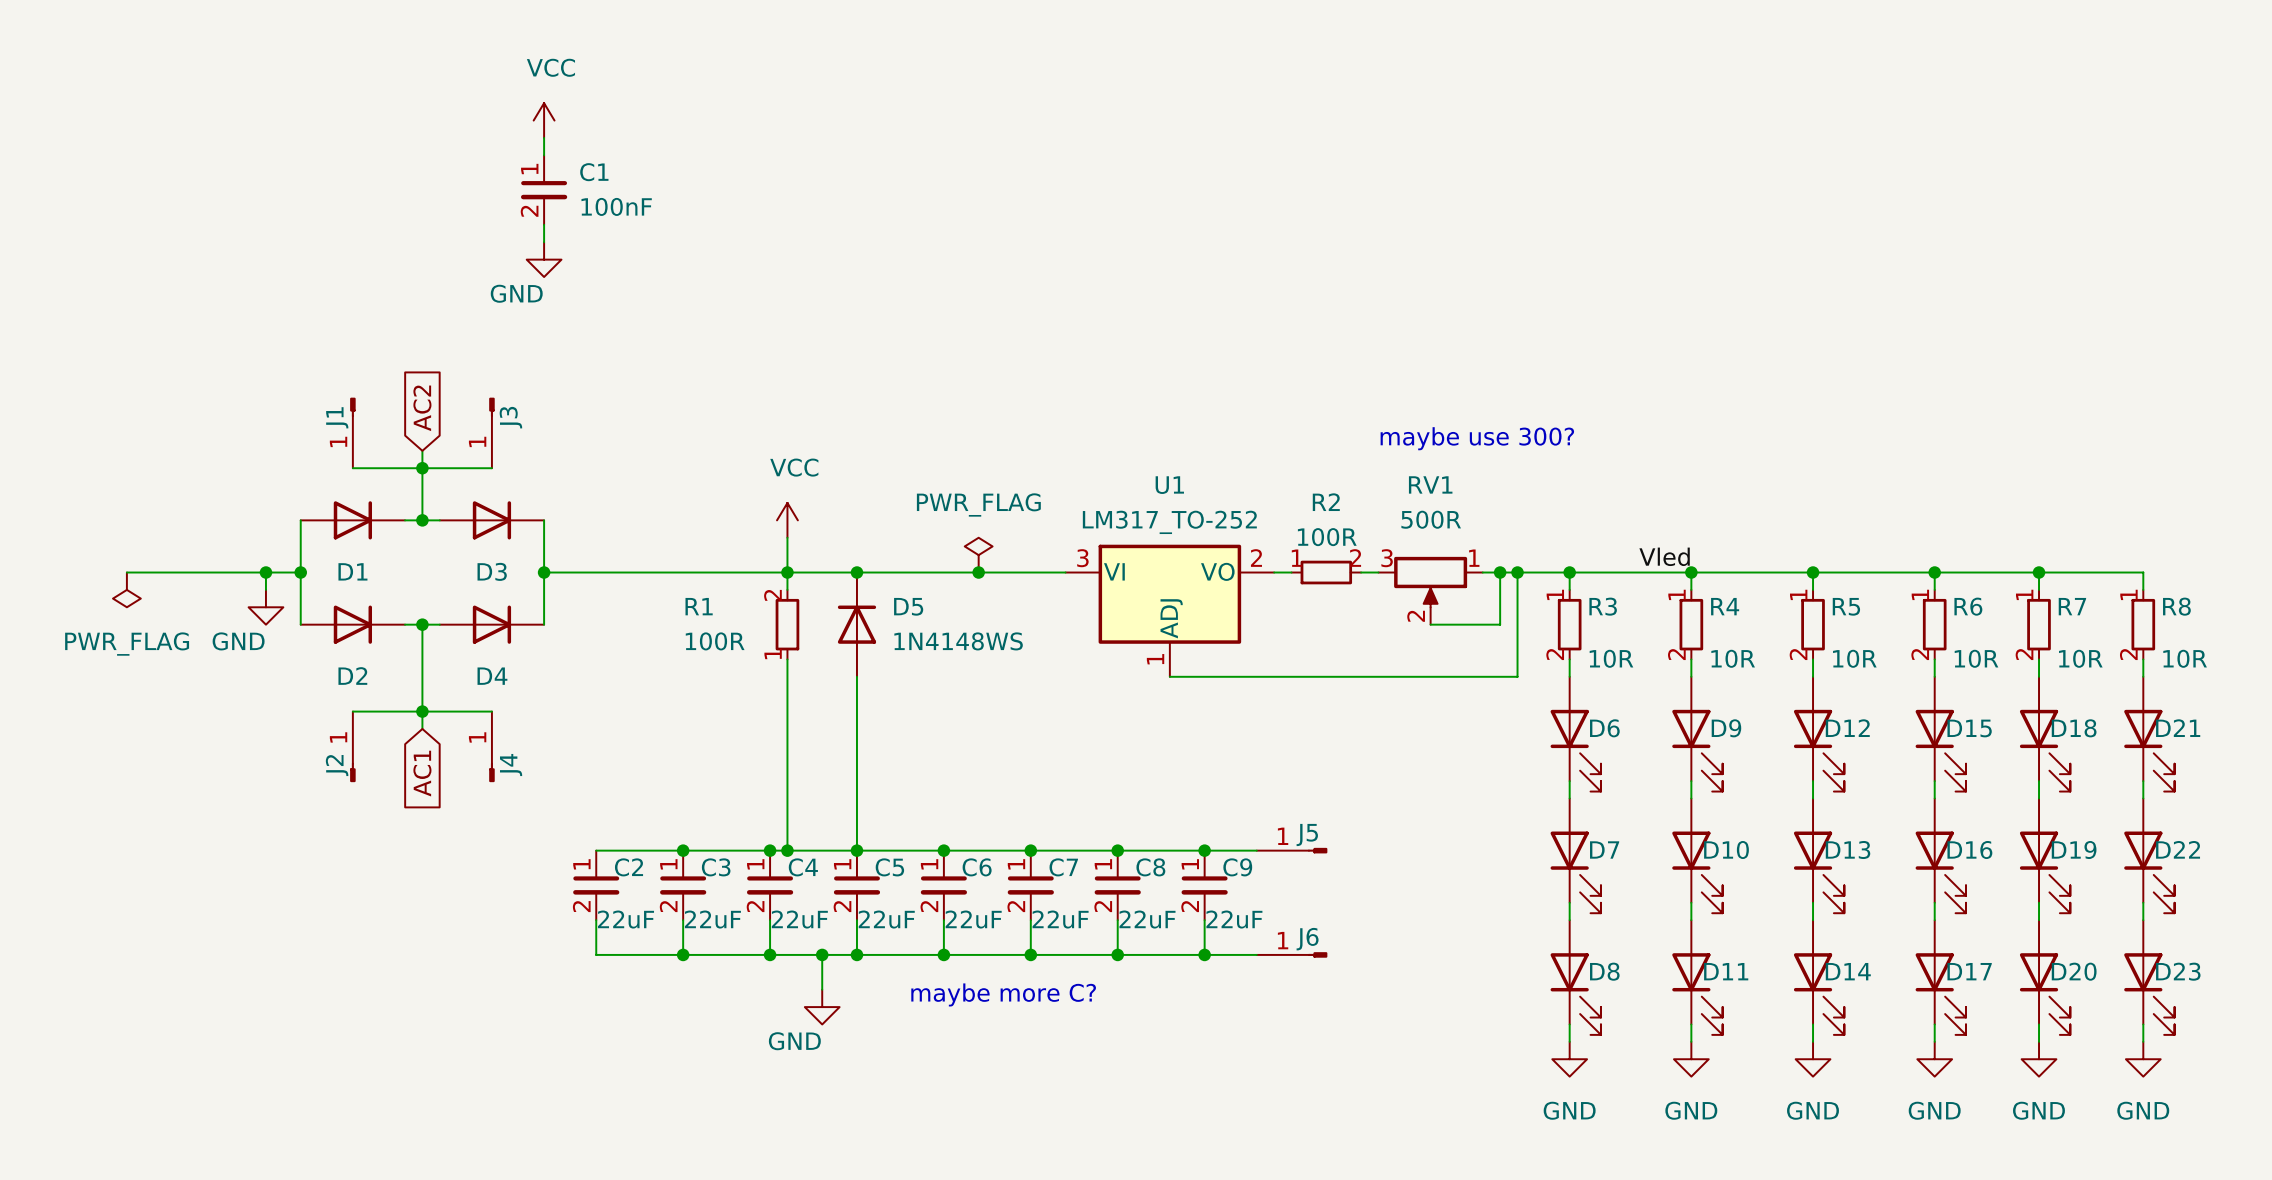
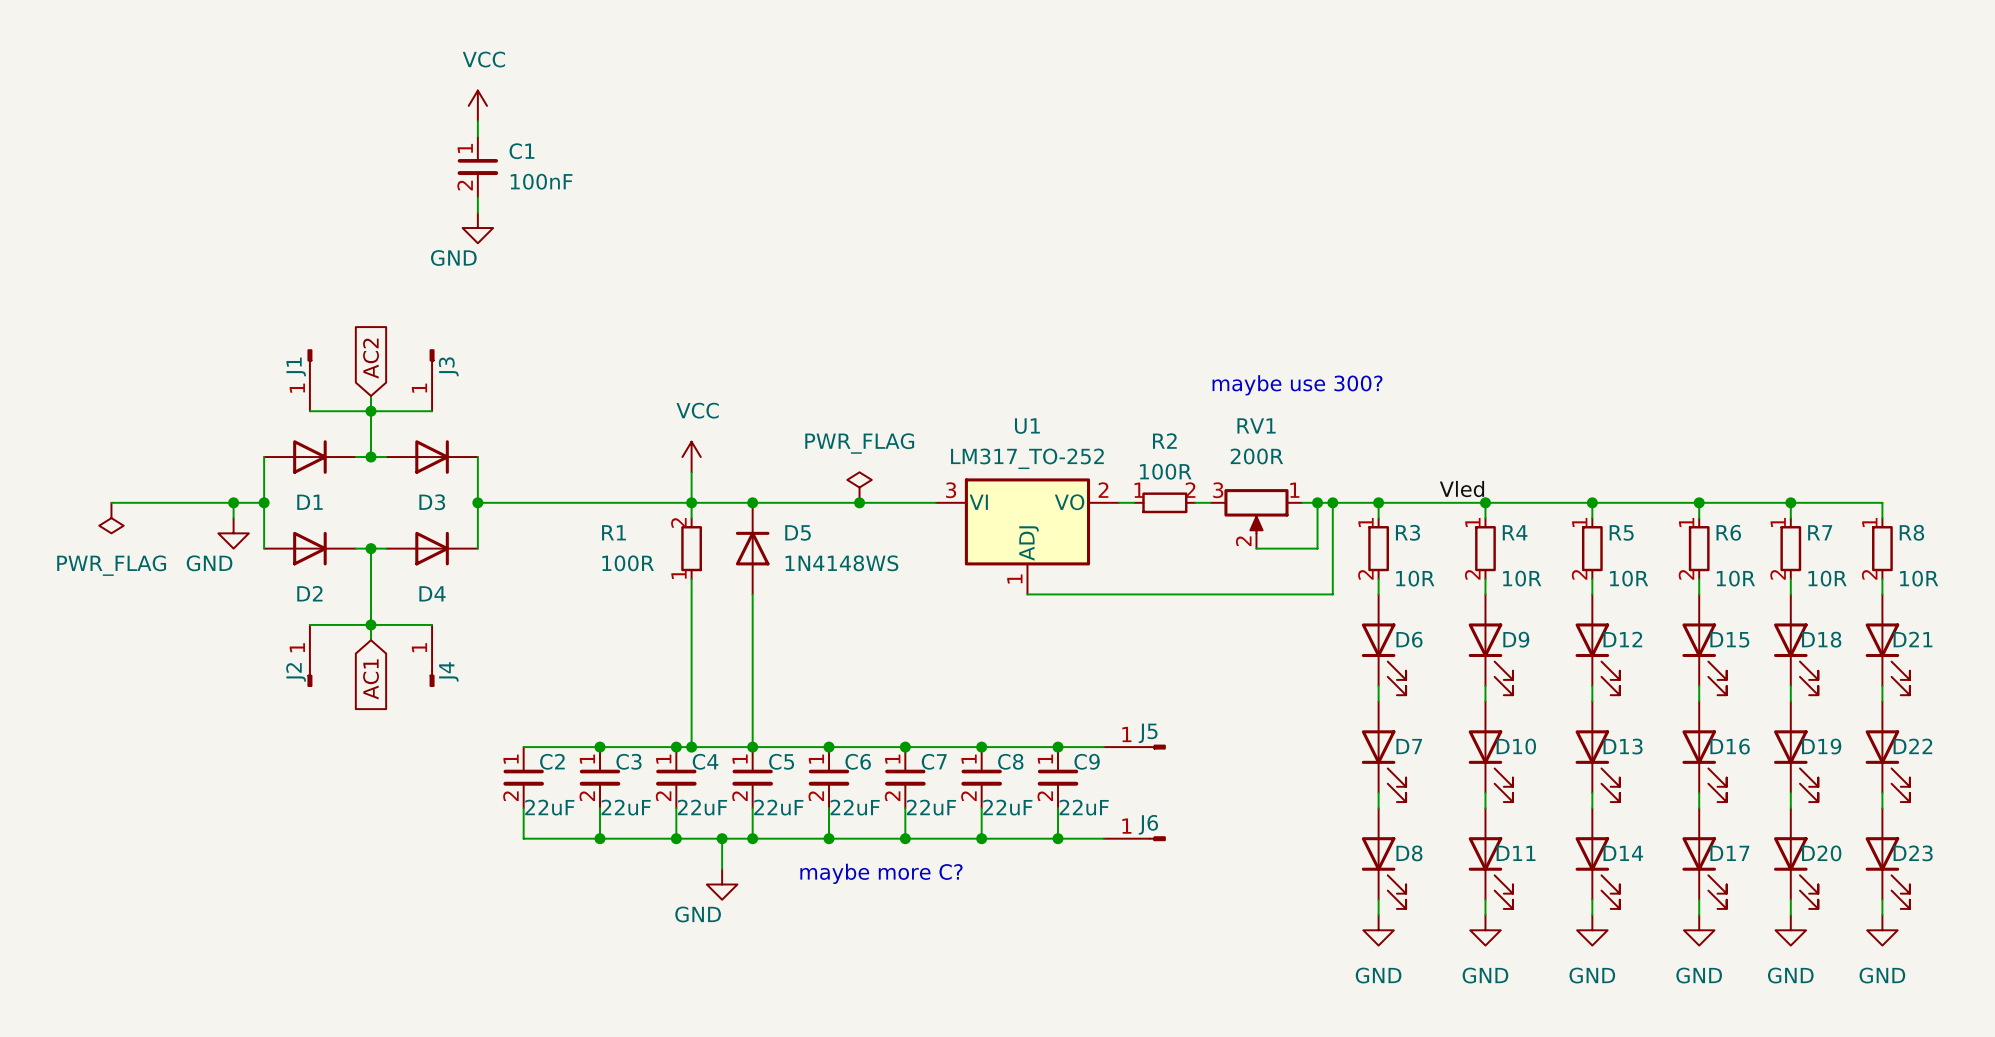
RV1 value: 500R (1431, 519) -> 200R (1256, 456)

